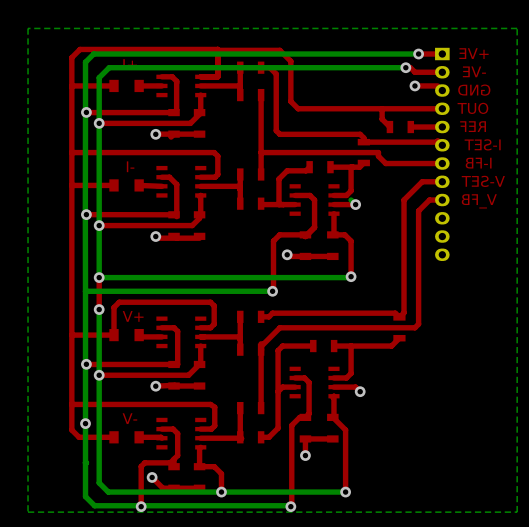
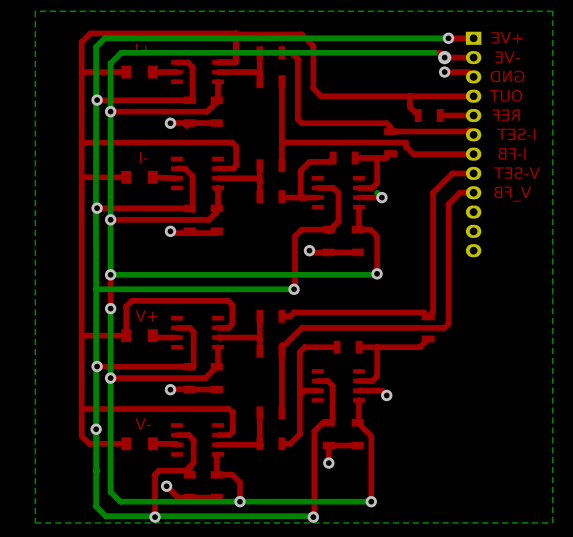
via: (405, 67) -> none
via: none -> (444, 57)

